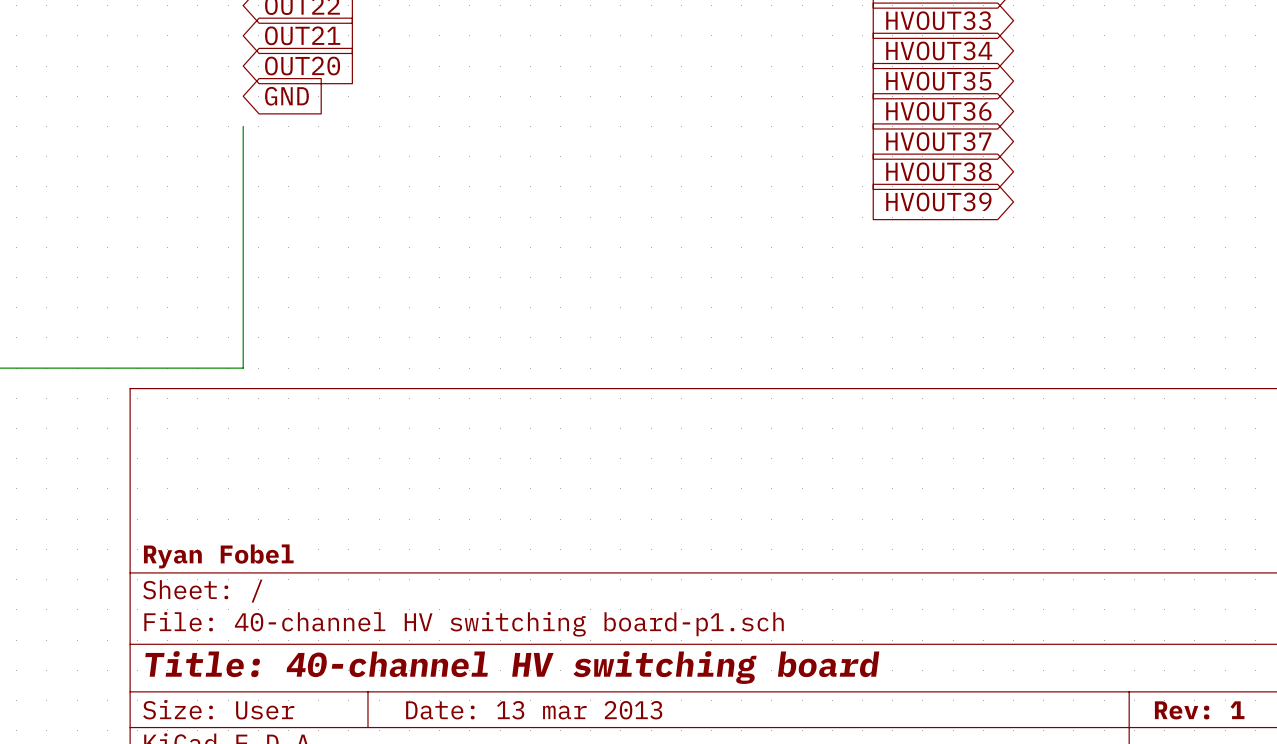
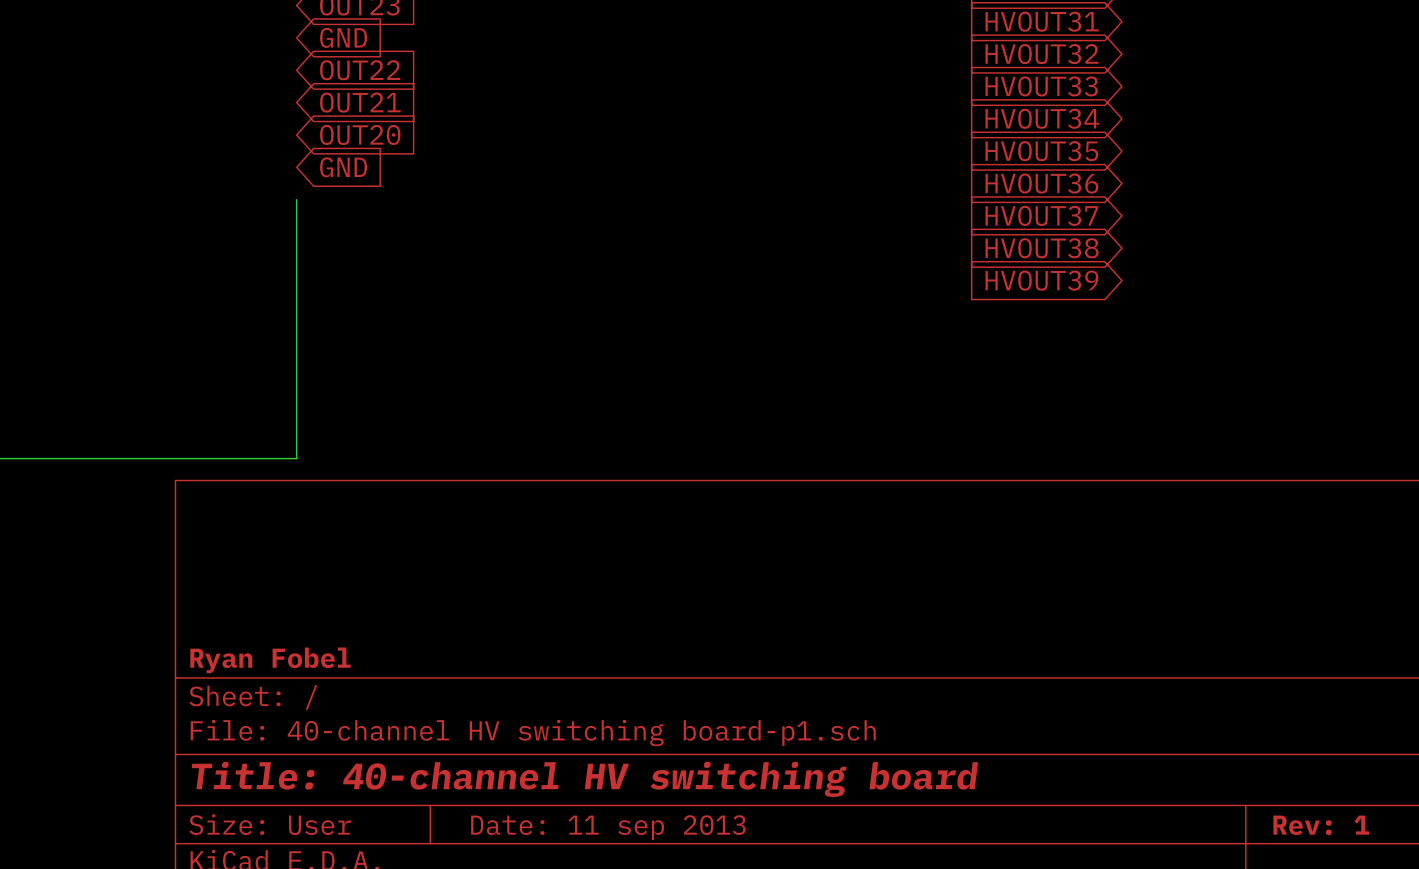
title block: Date: 13 mar 2013 (534, 710) -> Date: 11 sep 2013 (608, 827)

